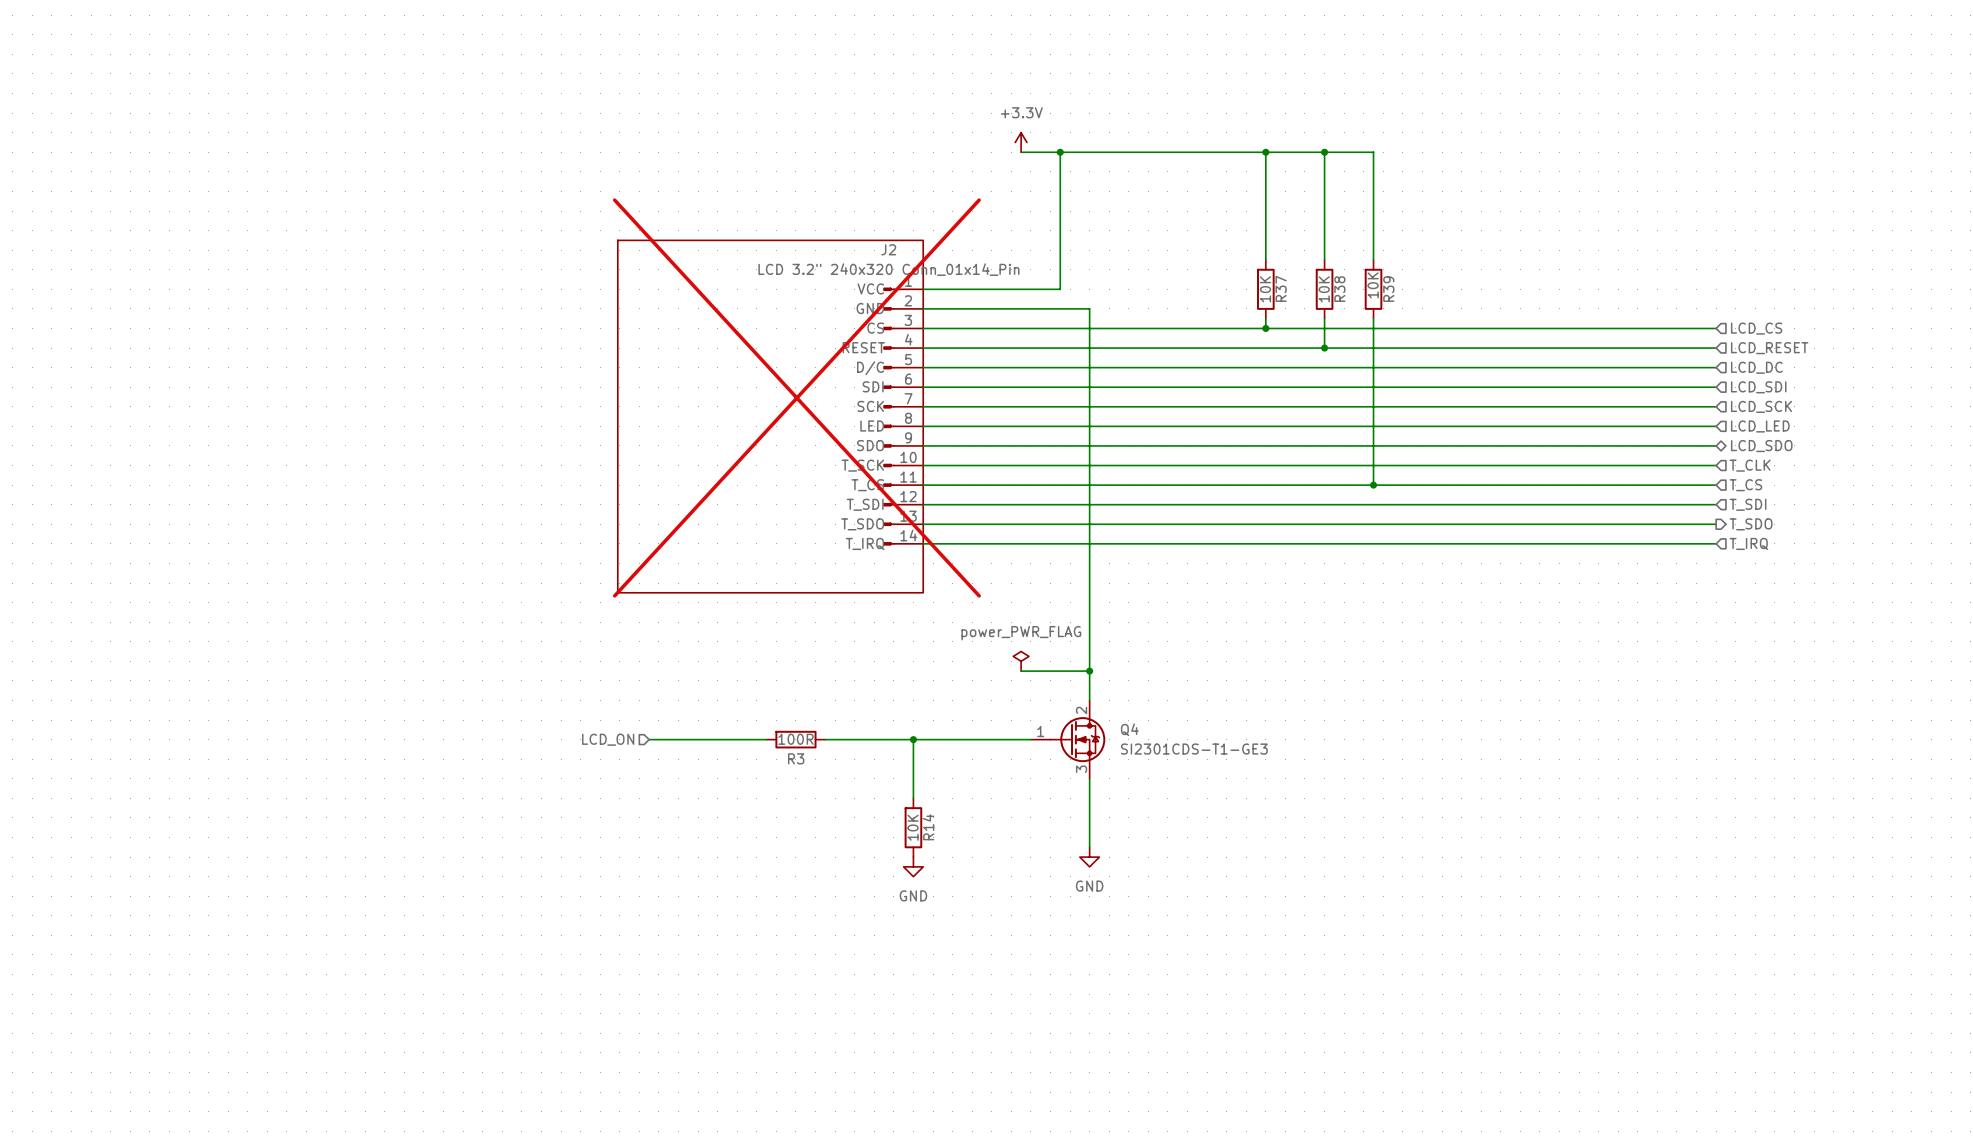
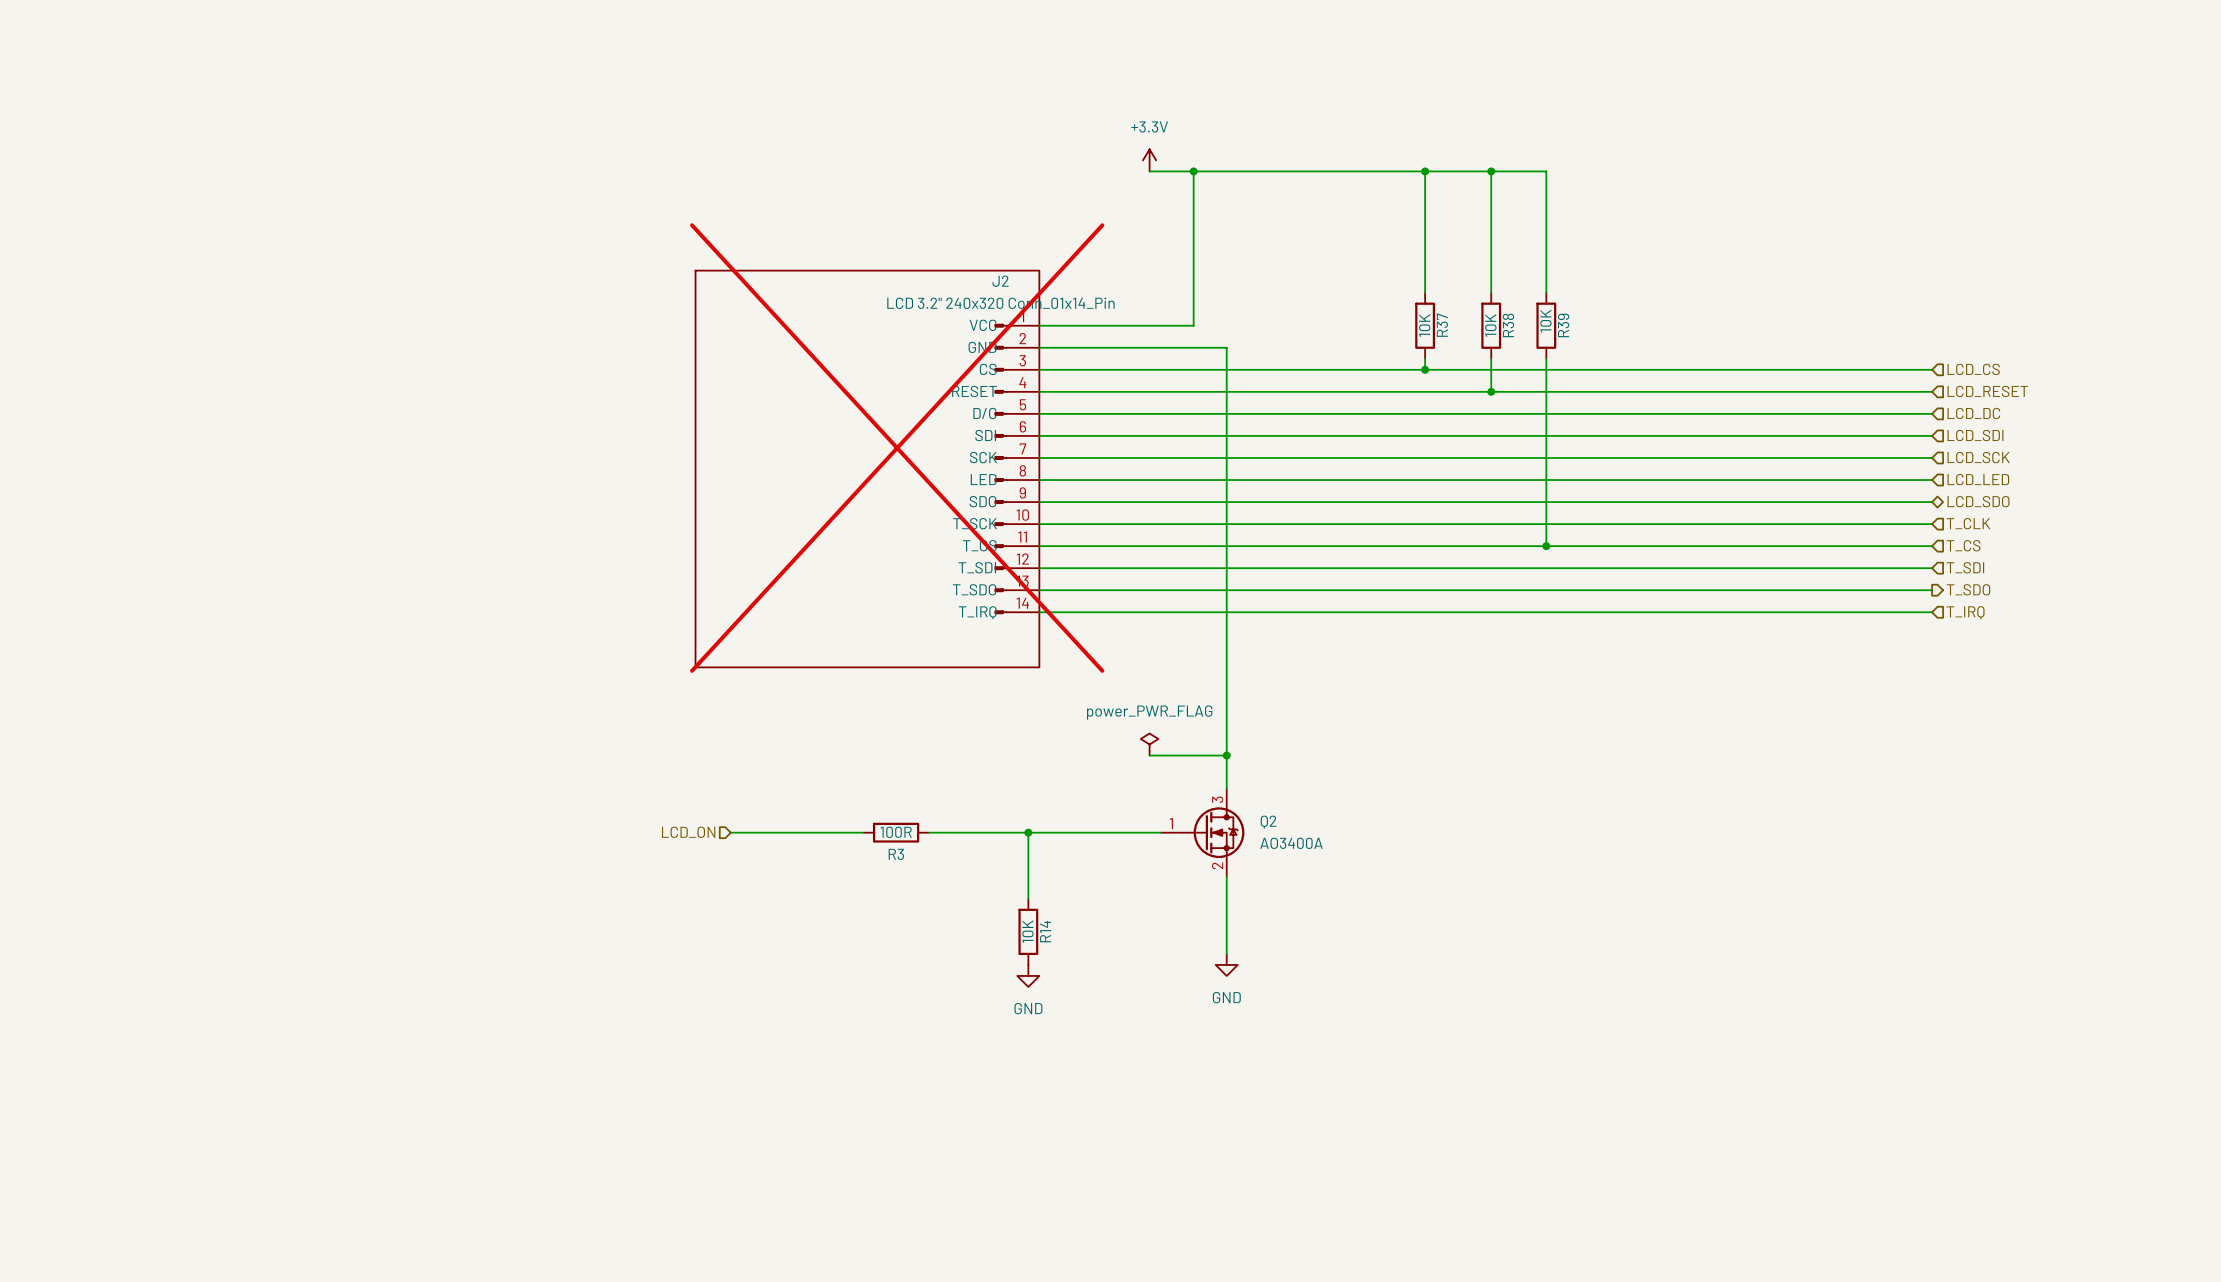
Q4 pin number: 2 (1081, 710) -> 3 (1217, 799)
Q4 name: Q4 (1129, 729) -> Q2 (1268, 822)
Q4 value: SI2301CDS-T1-GE3 (1194, 749) -> AO3400A (1291, 843)
Q4 pin number: 3 (1081, 769) -> 2 (1217, 865)

